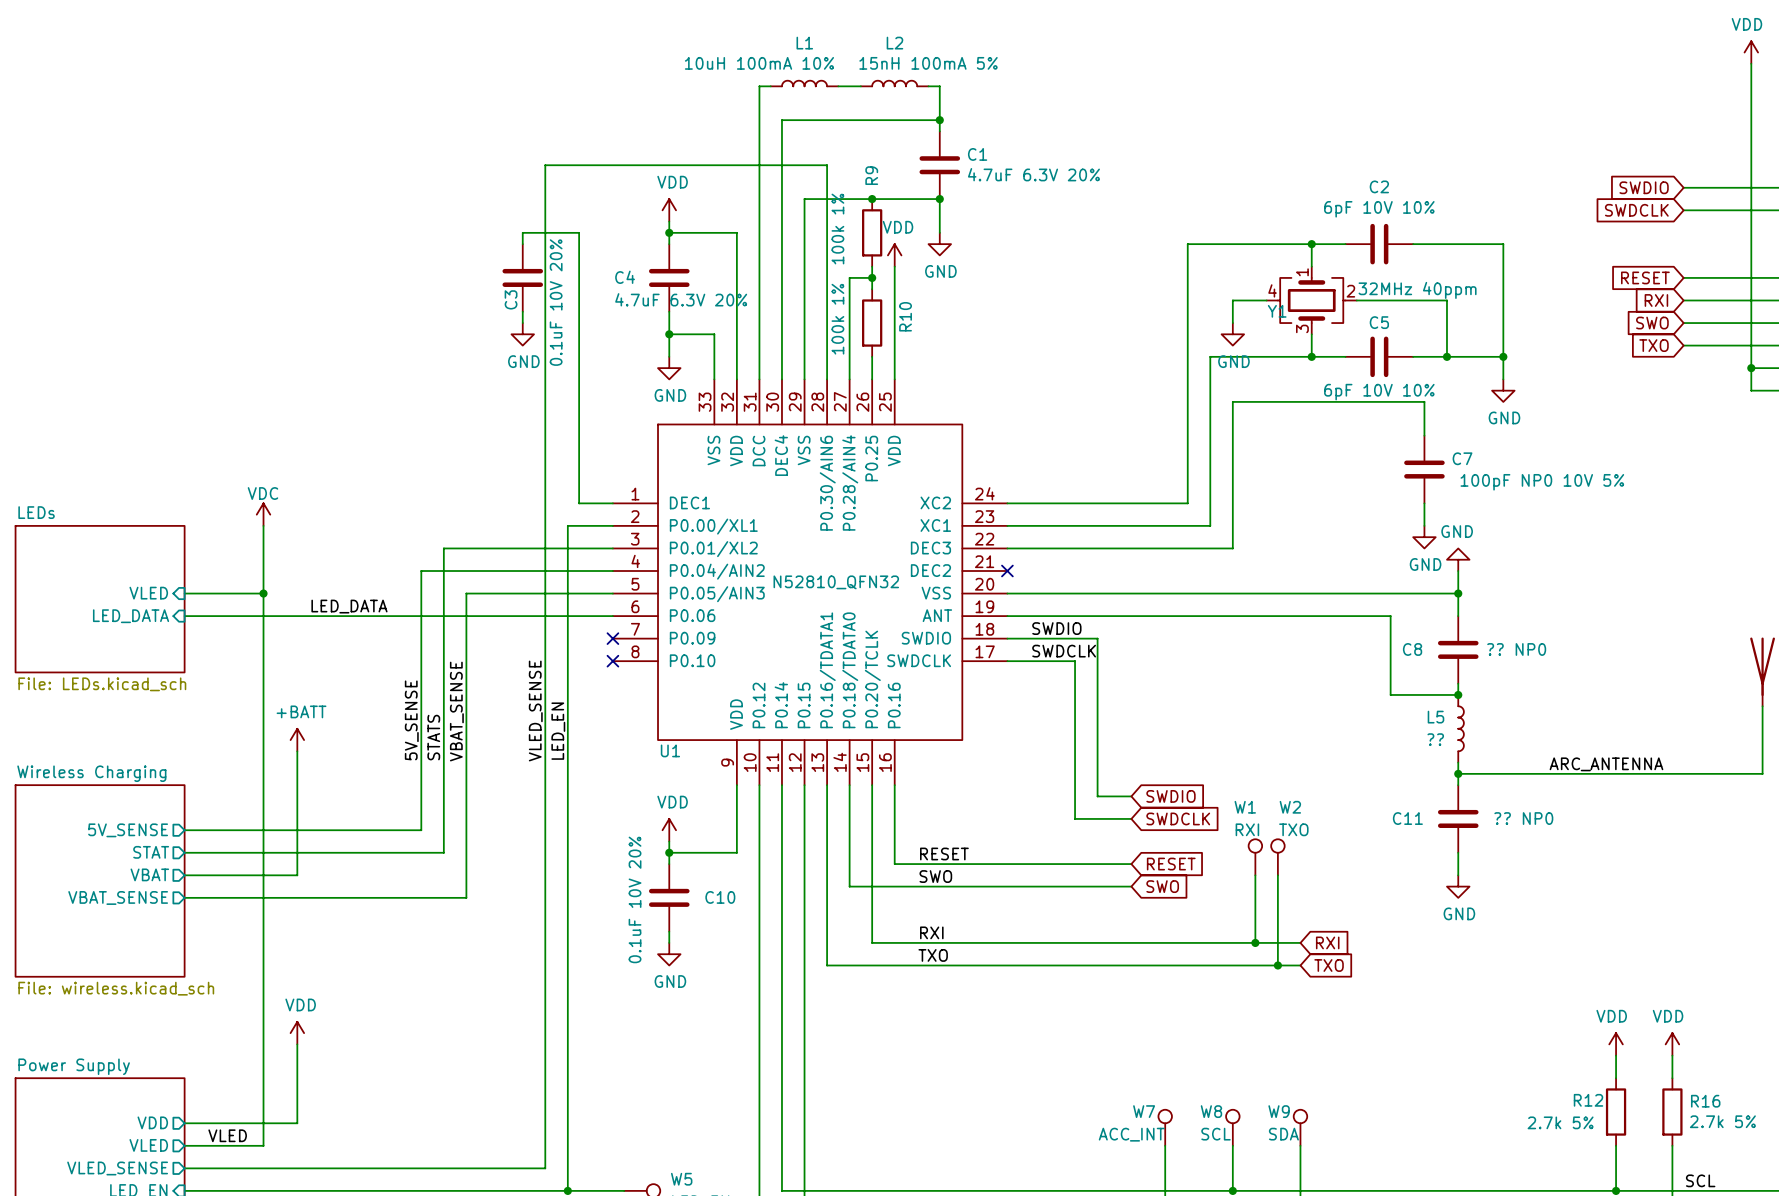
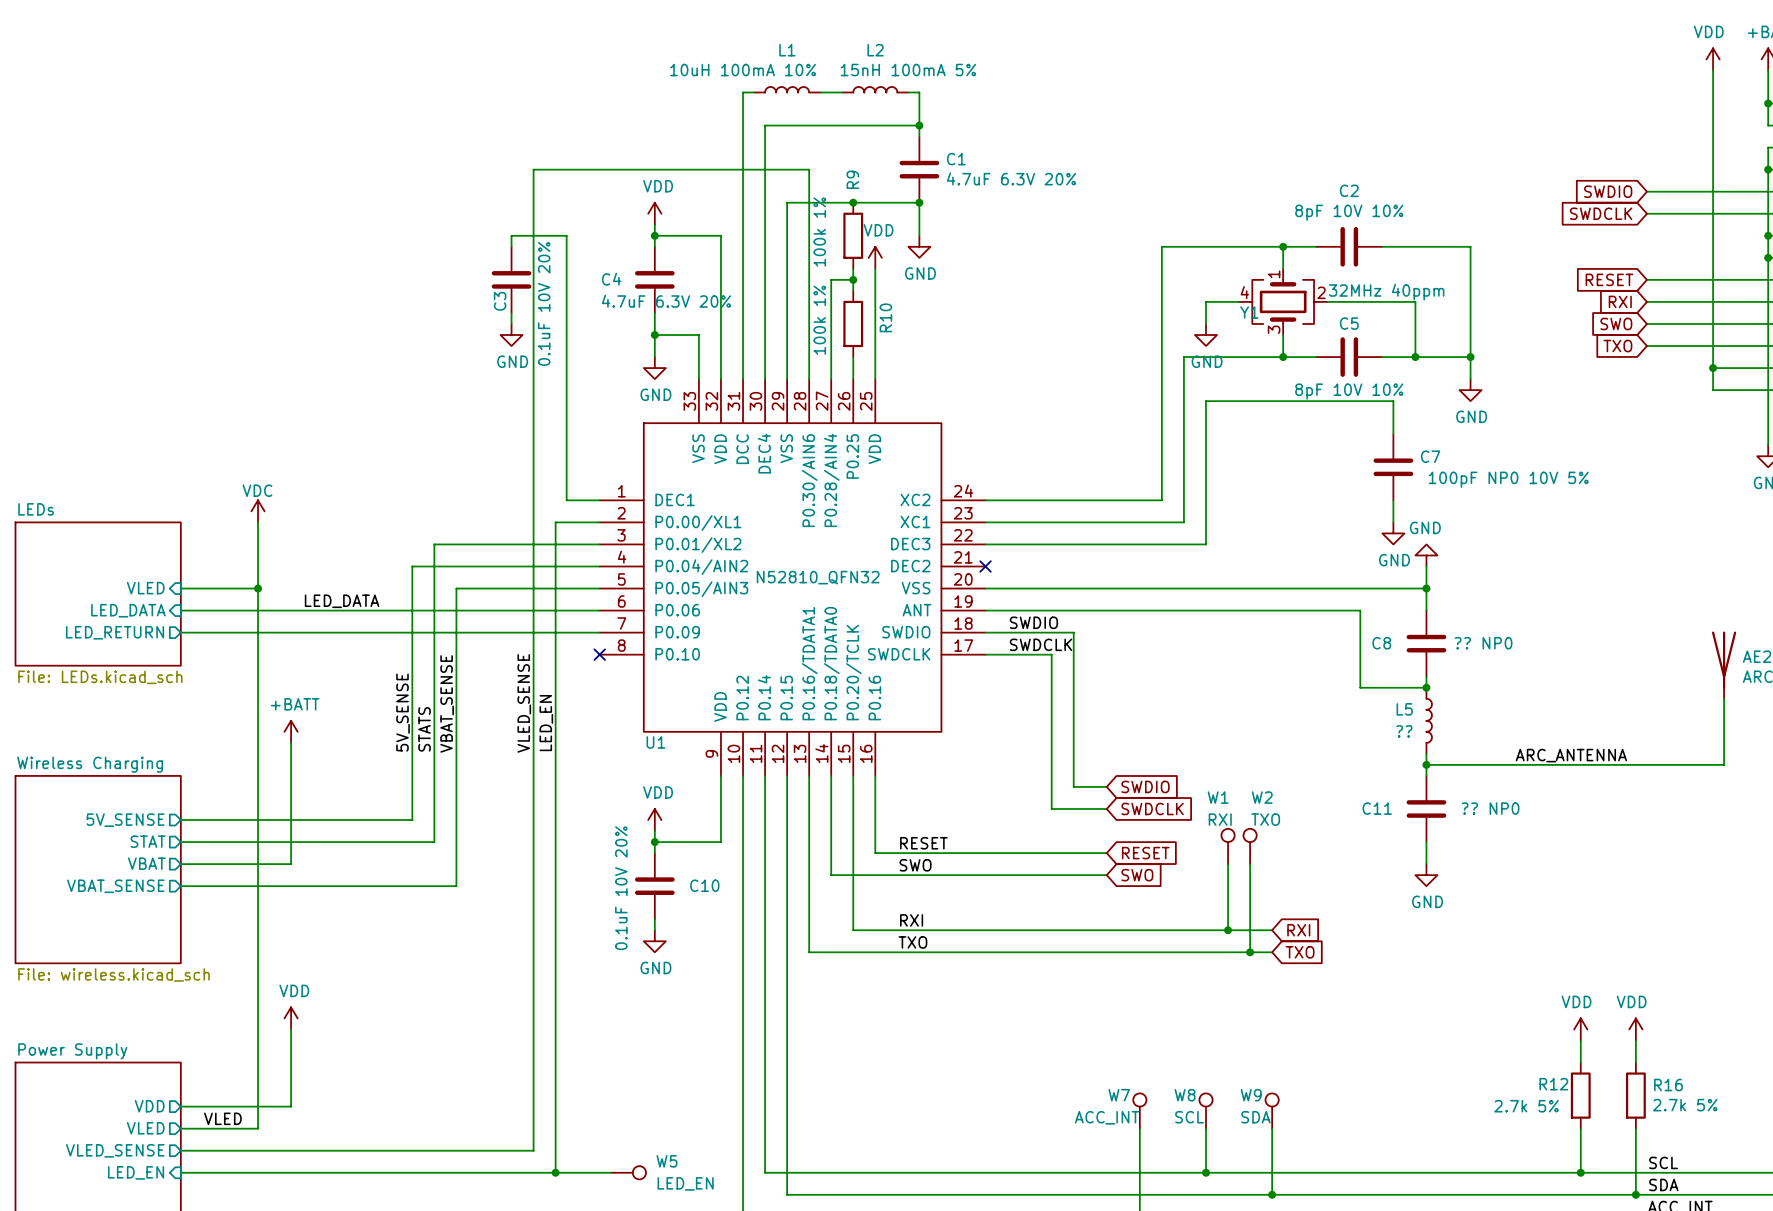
C2 value: 6pF 10V 10% (1379, 209) -> 8pF 10V 10% (1349, 212)
C5 value: 6pF 10V 10% (1379, 392) -> 8pF 10V 10% (1349, 391)
sheet pin: none -> LED_RETURN (115, 632)
wire: none -> (180, 632) (599, 632)
no-connect mark: (612, 638) -> none

